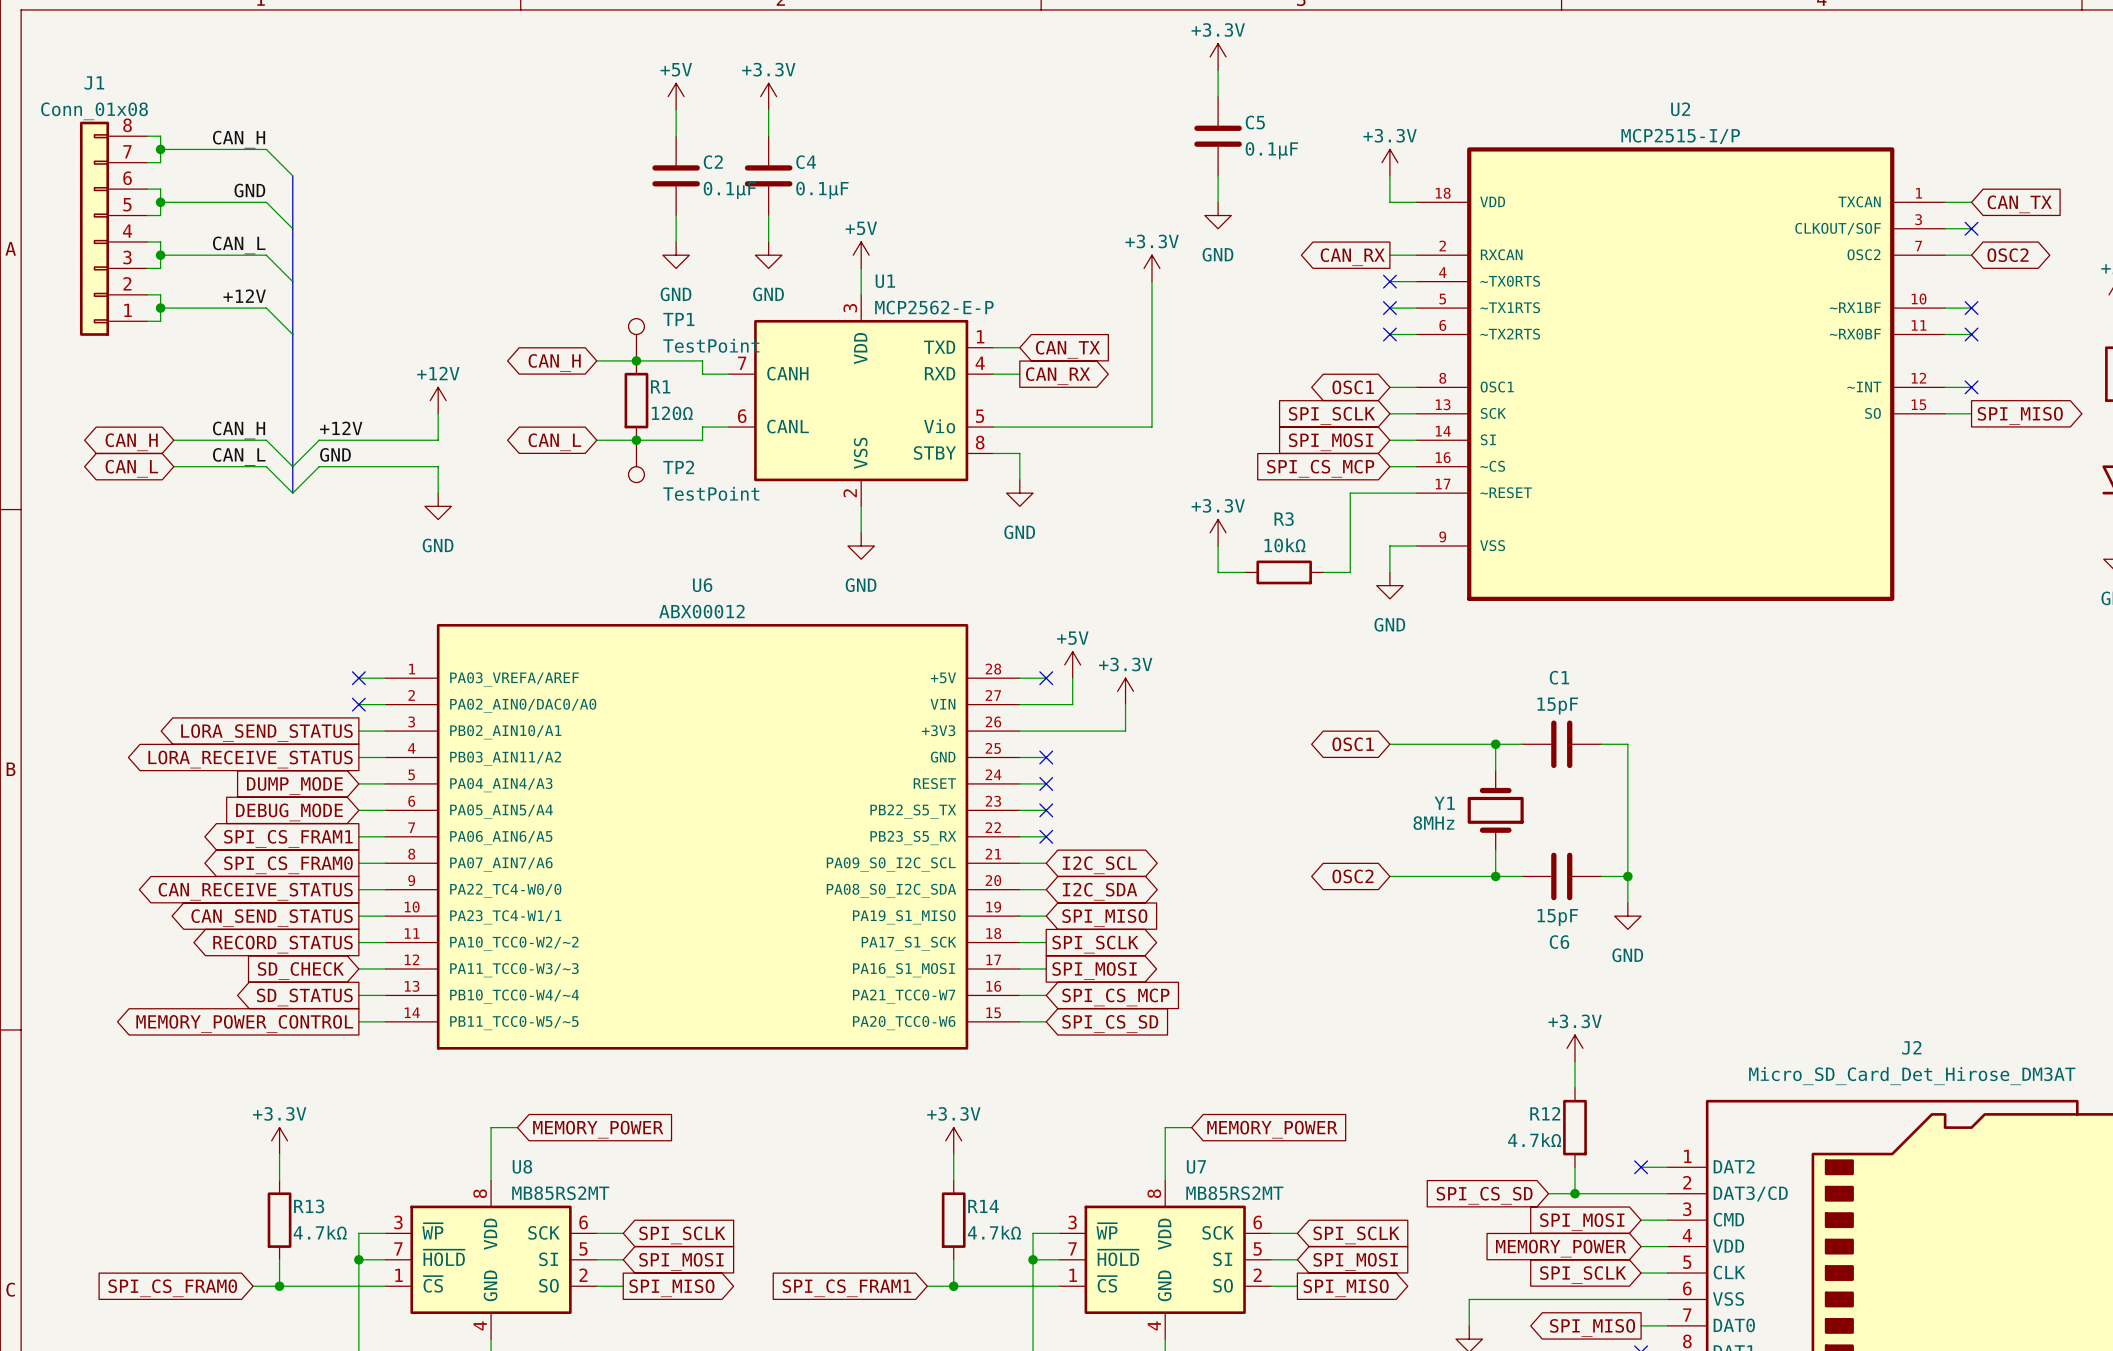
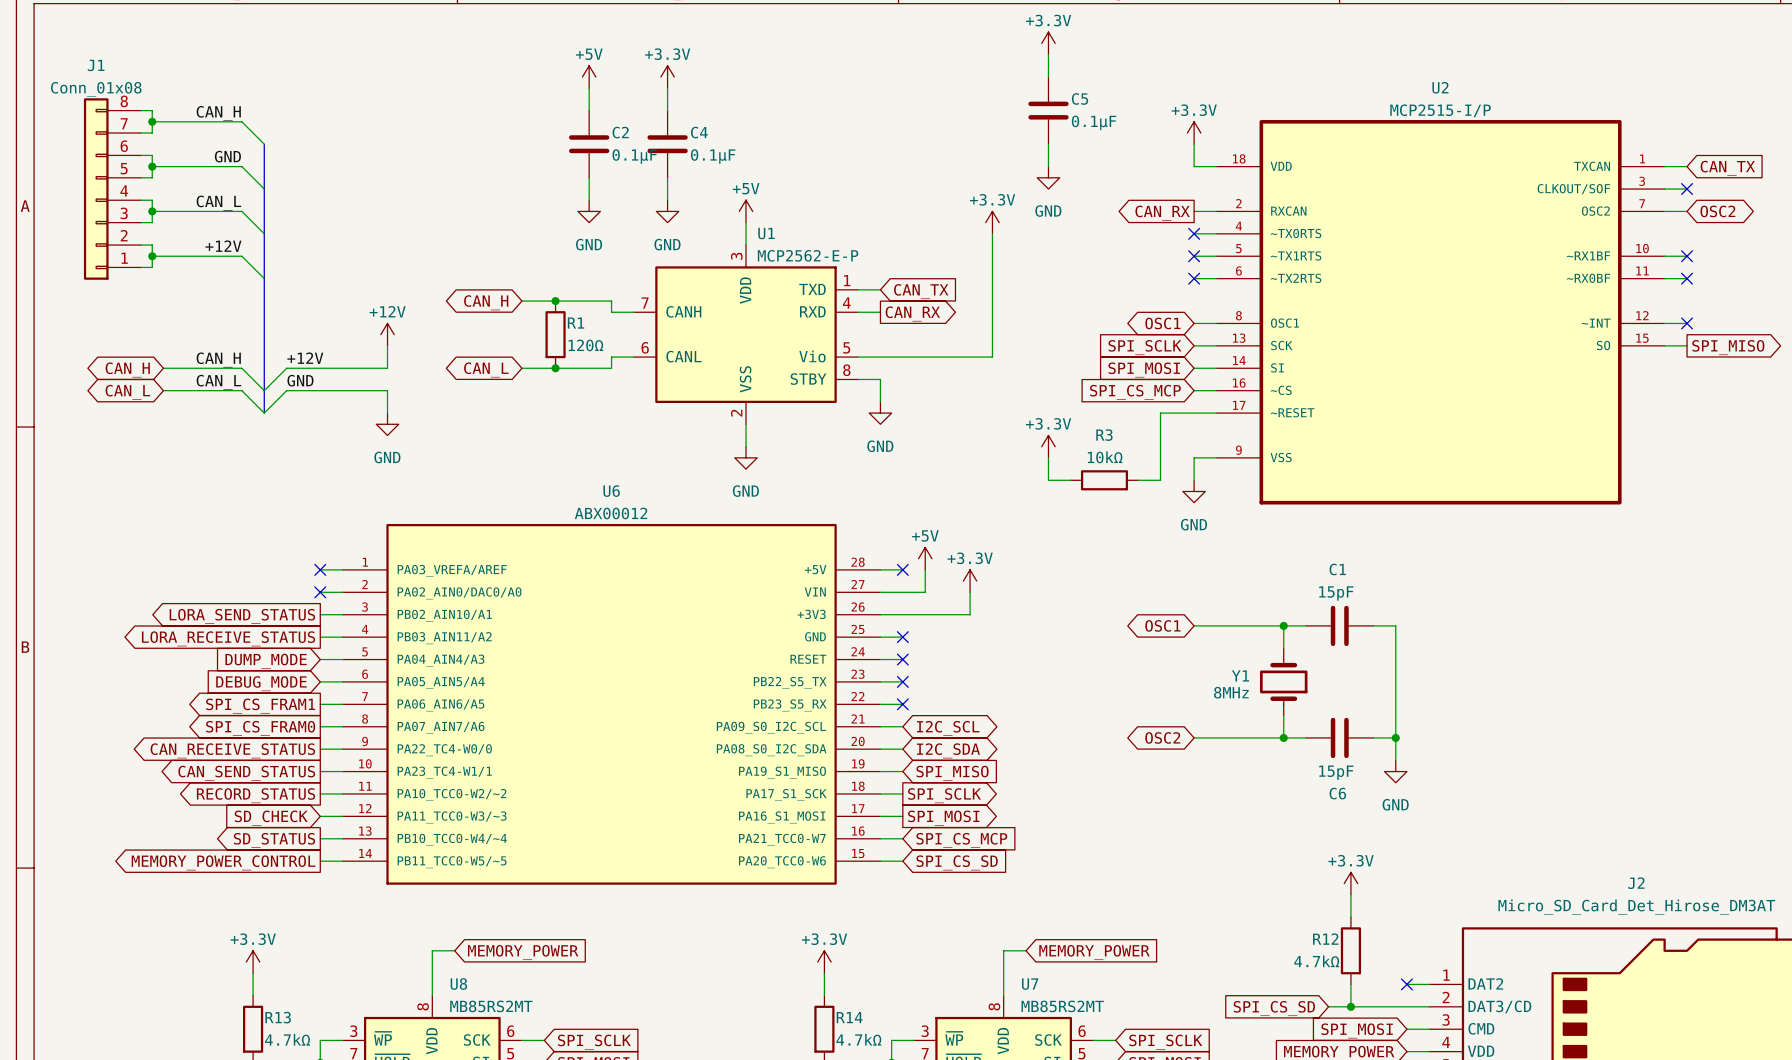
TP1: TestPoint (636, 339) -> none
TP2: TestPoint (636, 461) -> none

